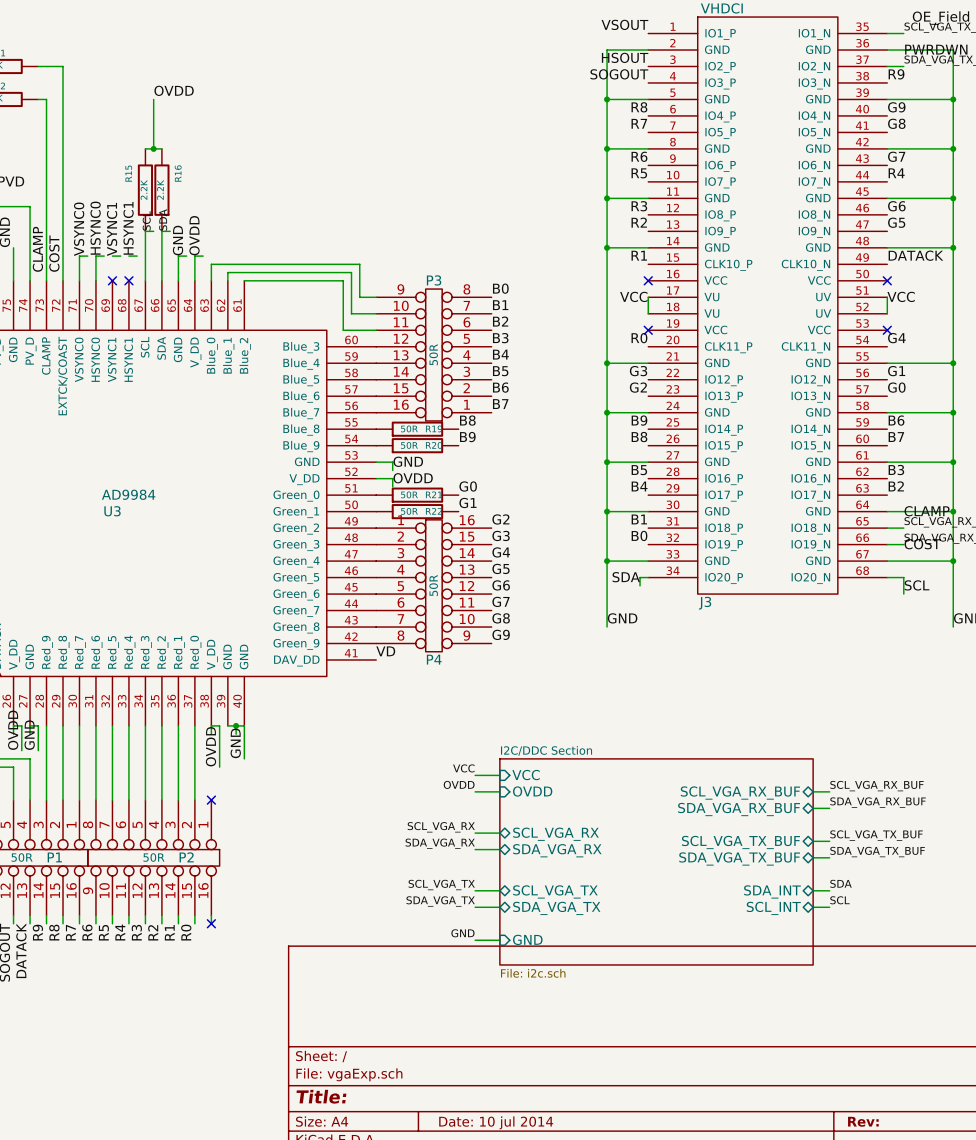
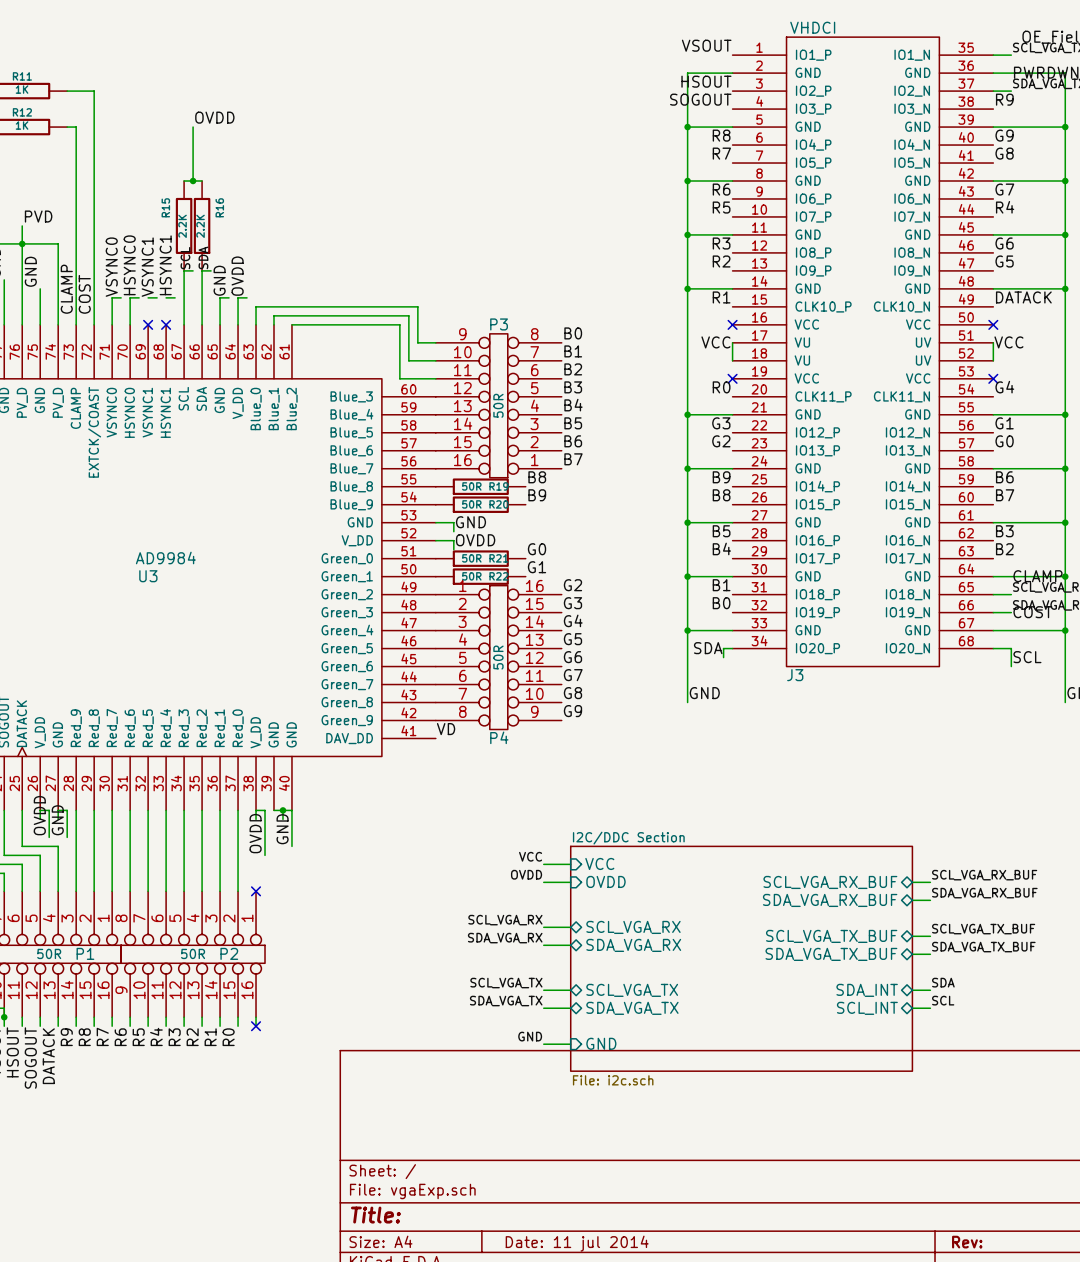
title block: Date: 10 jul 2014 (496, 1122) -> Date: 11 jul 2014 (577, 1243)

